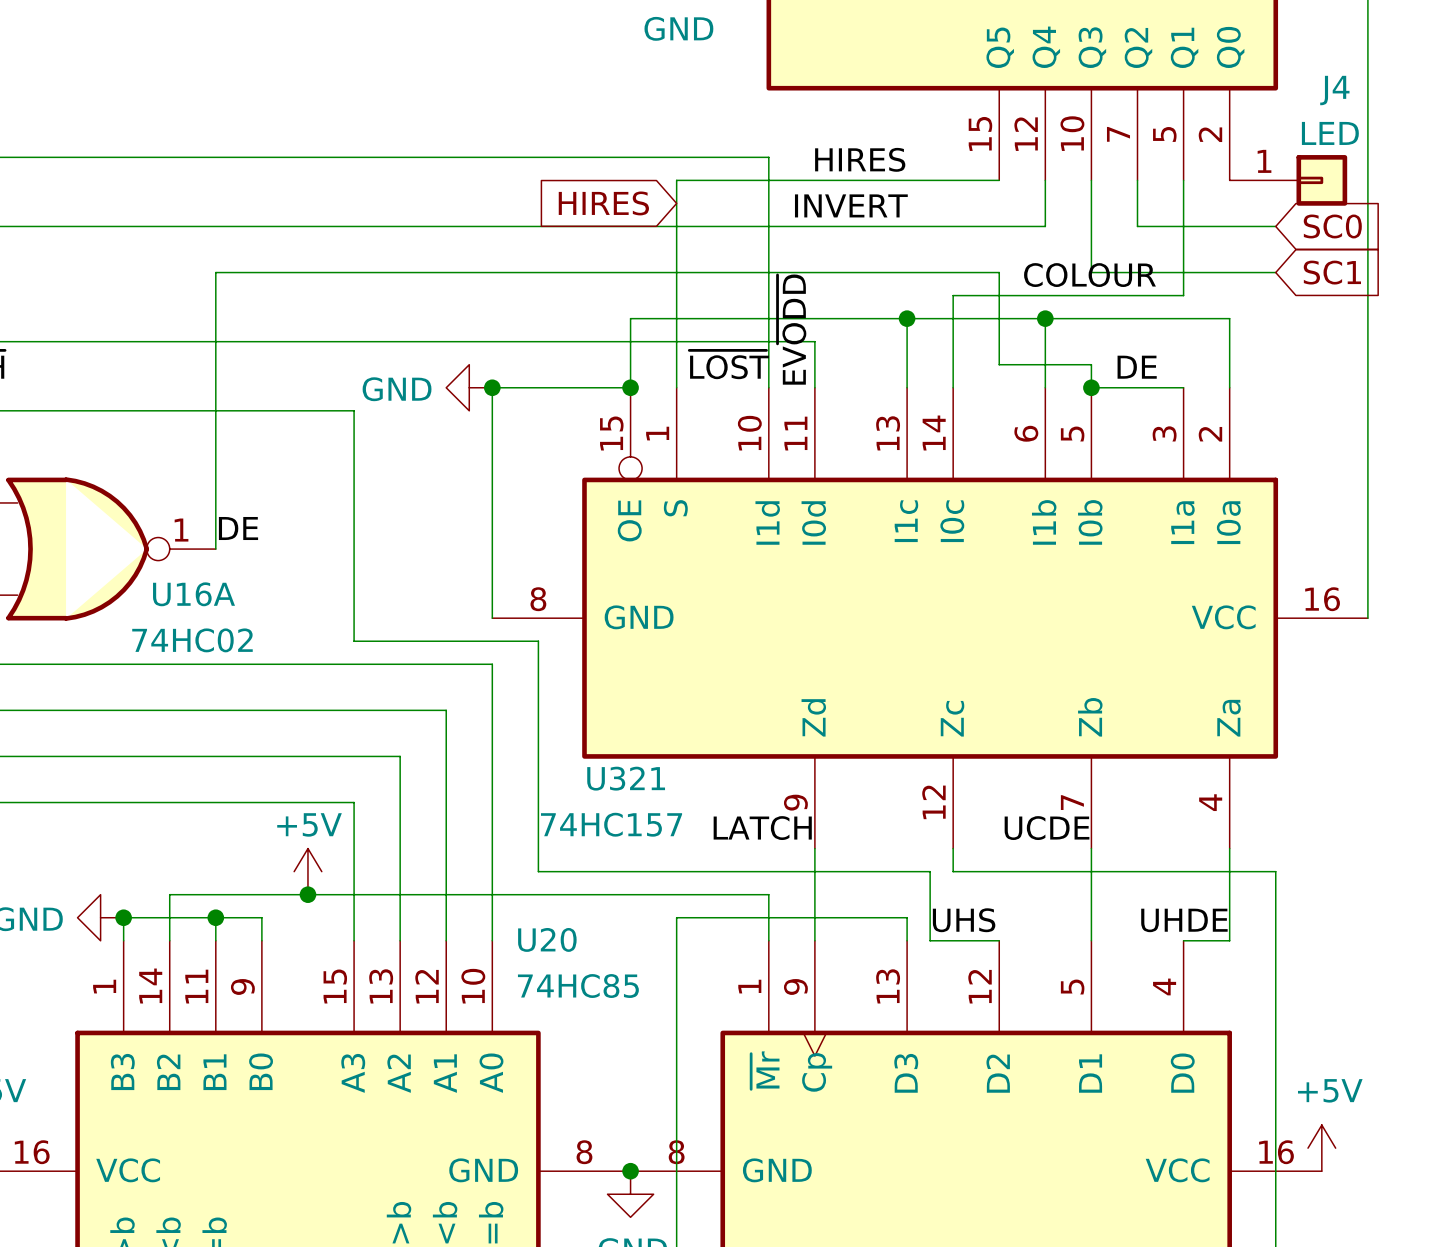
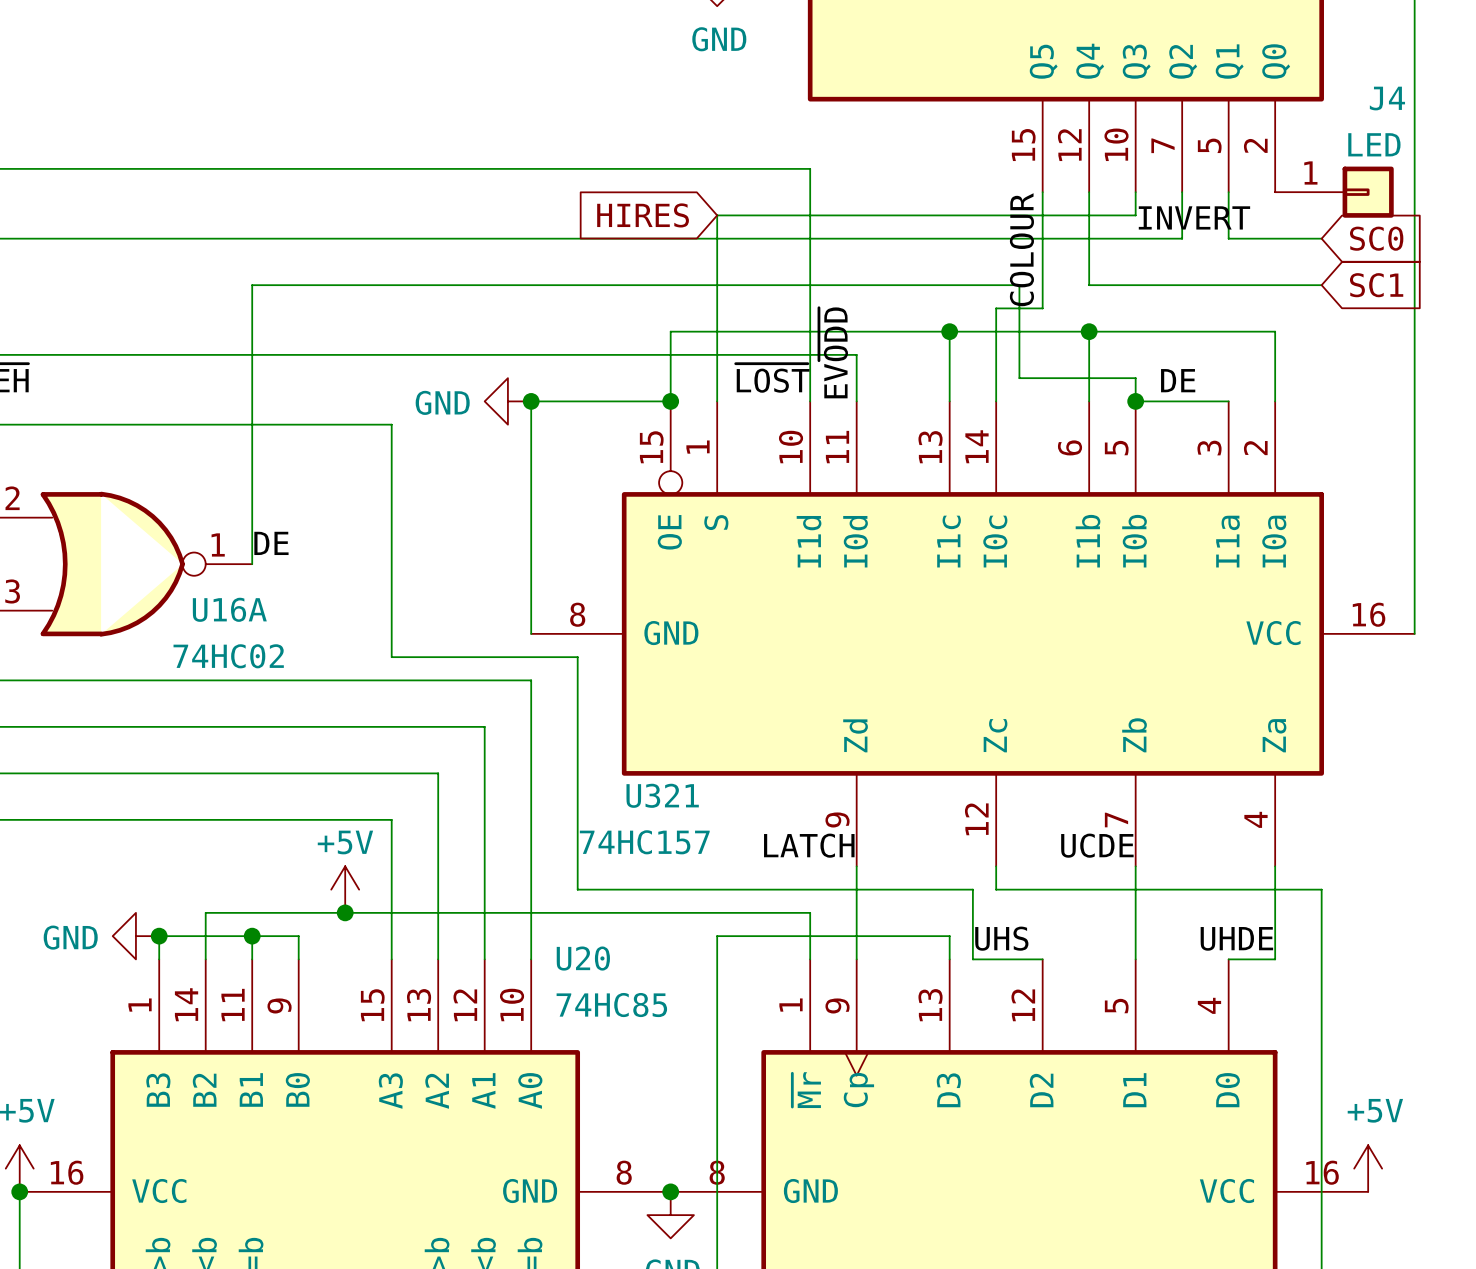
label: HIRES (860, 159) -> none
wire: (999, 180) (676, 180) (676, 203) -> (1135, 215) (717, 215)
wire: none -> (1042, 192) (1042, 285)
wire: (1091, 203) (1091, 272) -> (1182, 238) (1089, 238) (1089, 285) (1135, 285)
label position: INVERT (851, 205) -> INVERT (1194, 217)
wire: (1137, 226) (1183, 226) (1183, 295) (999, 295) (999, 364) -> none
wire: (976, 272) (999, 272) -> (1019, 285) (1019, 378) (1042, 378)
label rotation: 0° (1089, 275) -> 90° counterclockwise (1021, 249)

